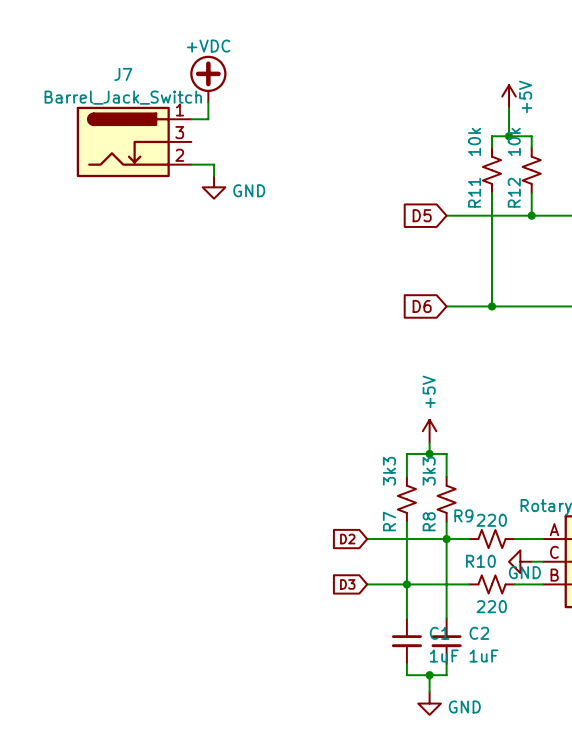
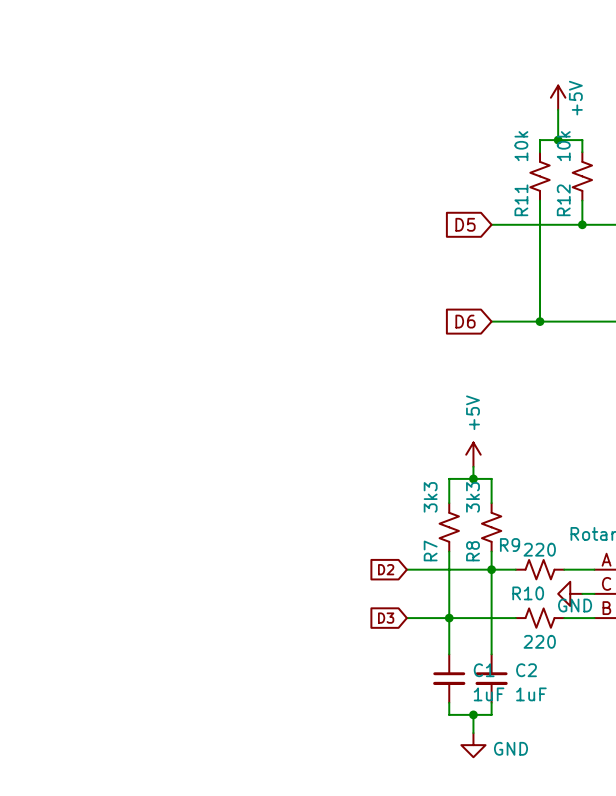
power symbol: +VDC (208, 78) -> none
wire: (208, 102) (208, 119) (191, 119) -> none
J7: Barrel_Jack_Switch (134, 141) -> none
wire: (191, 164) (214, 164) (214, 175) -> none
power symbol: GND (214, 187) -> none

